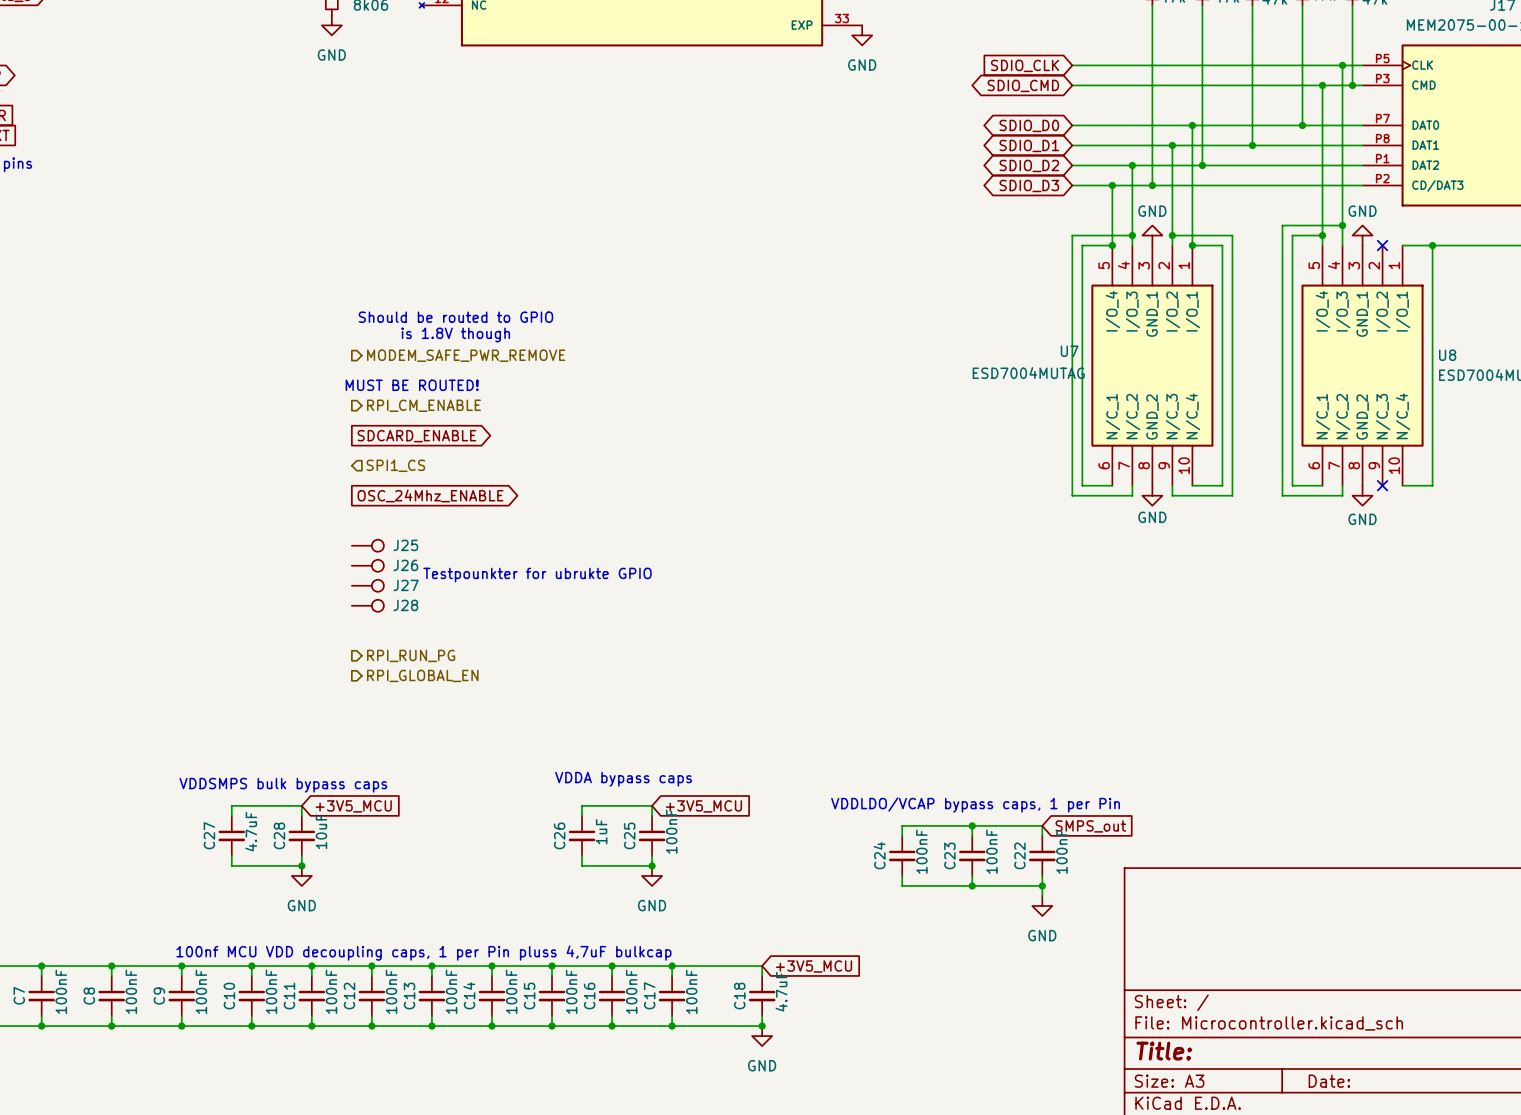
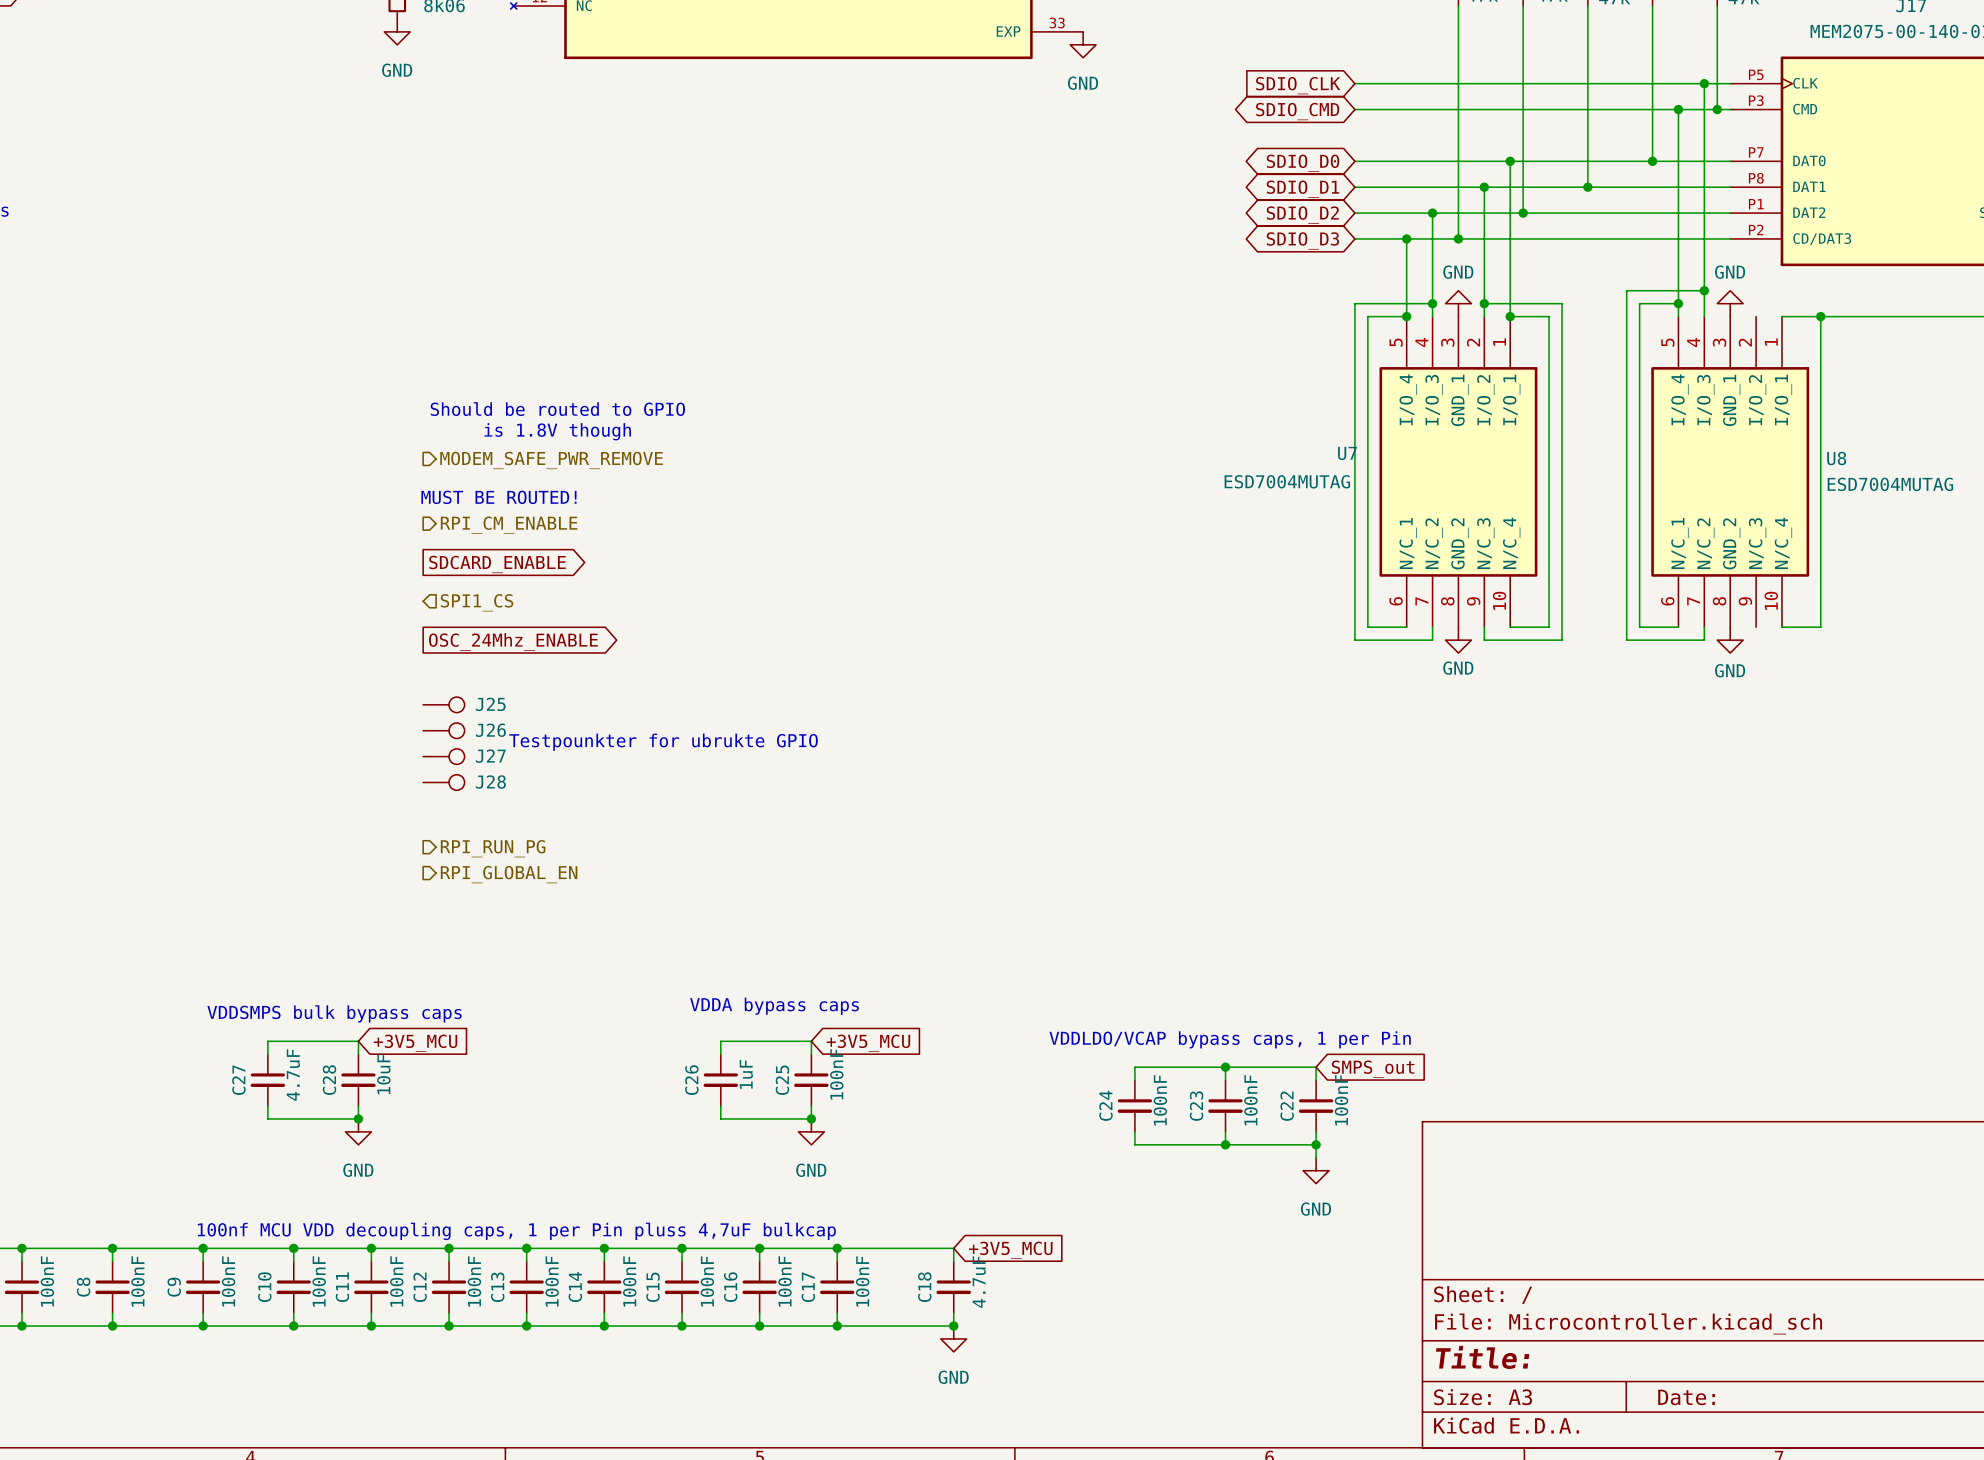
no-connect mark: (1382, 245) -> none
no-connect mark: (1382, 485) -> none

